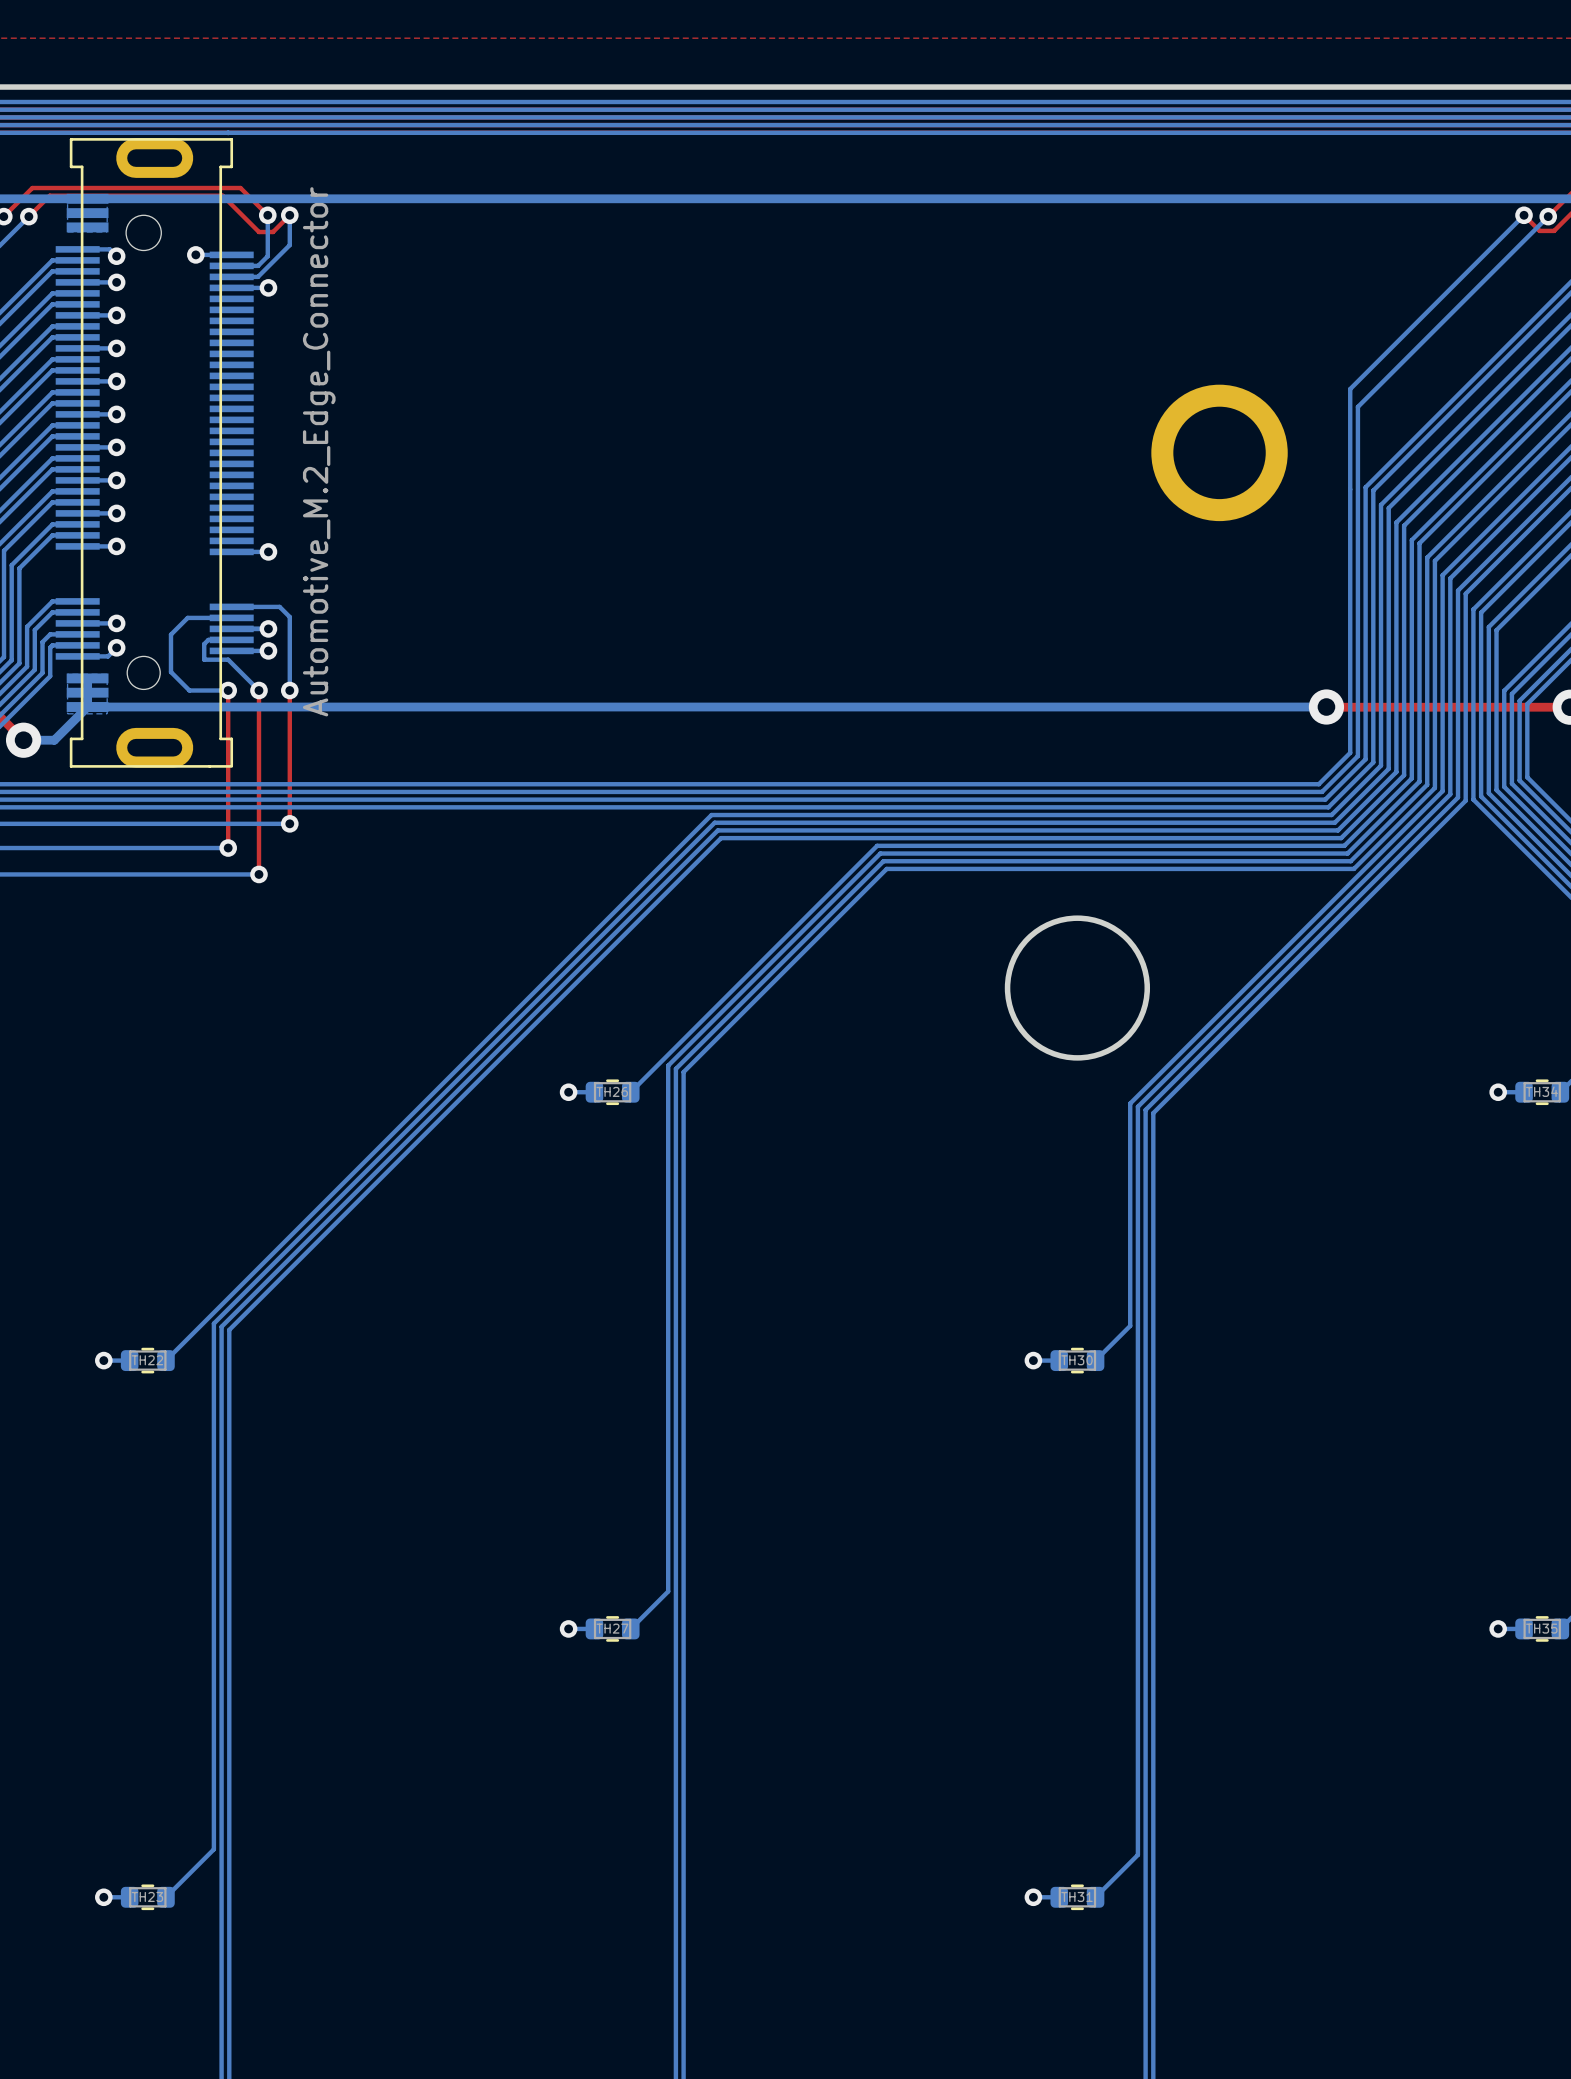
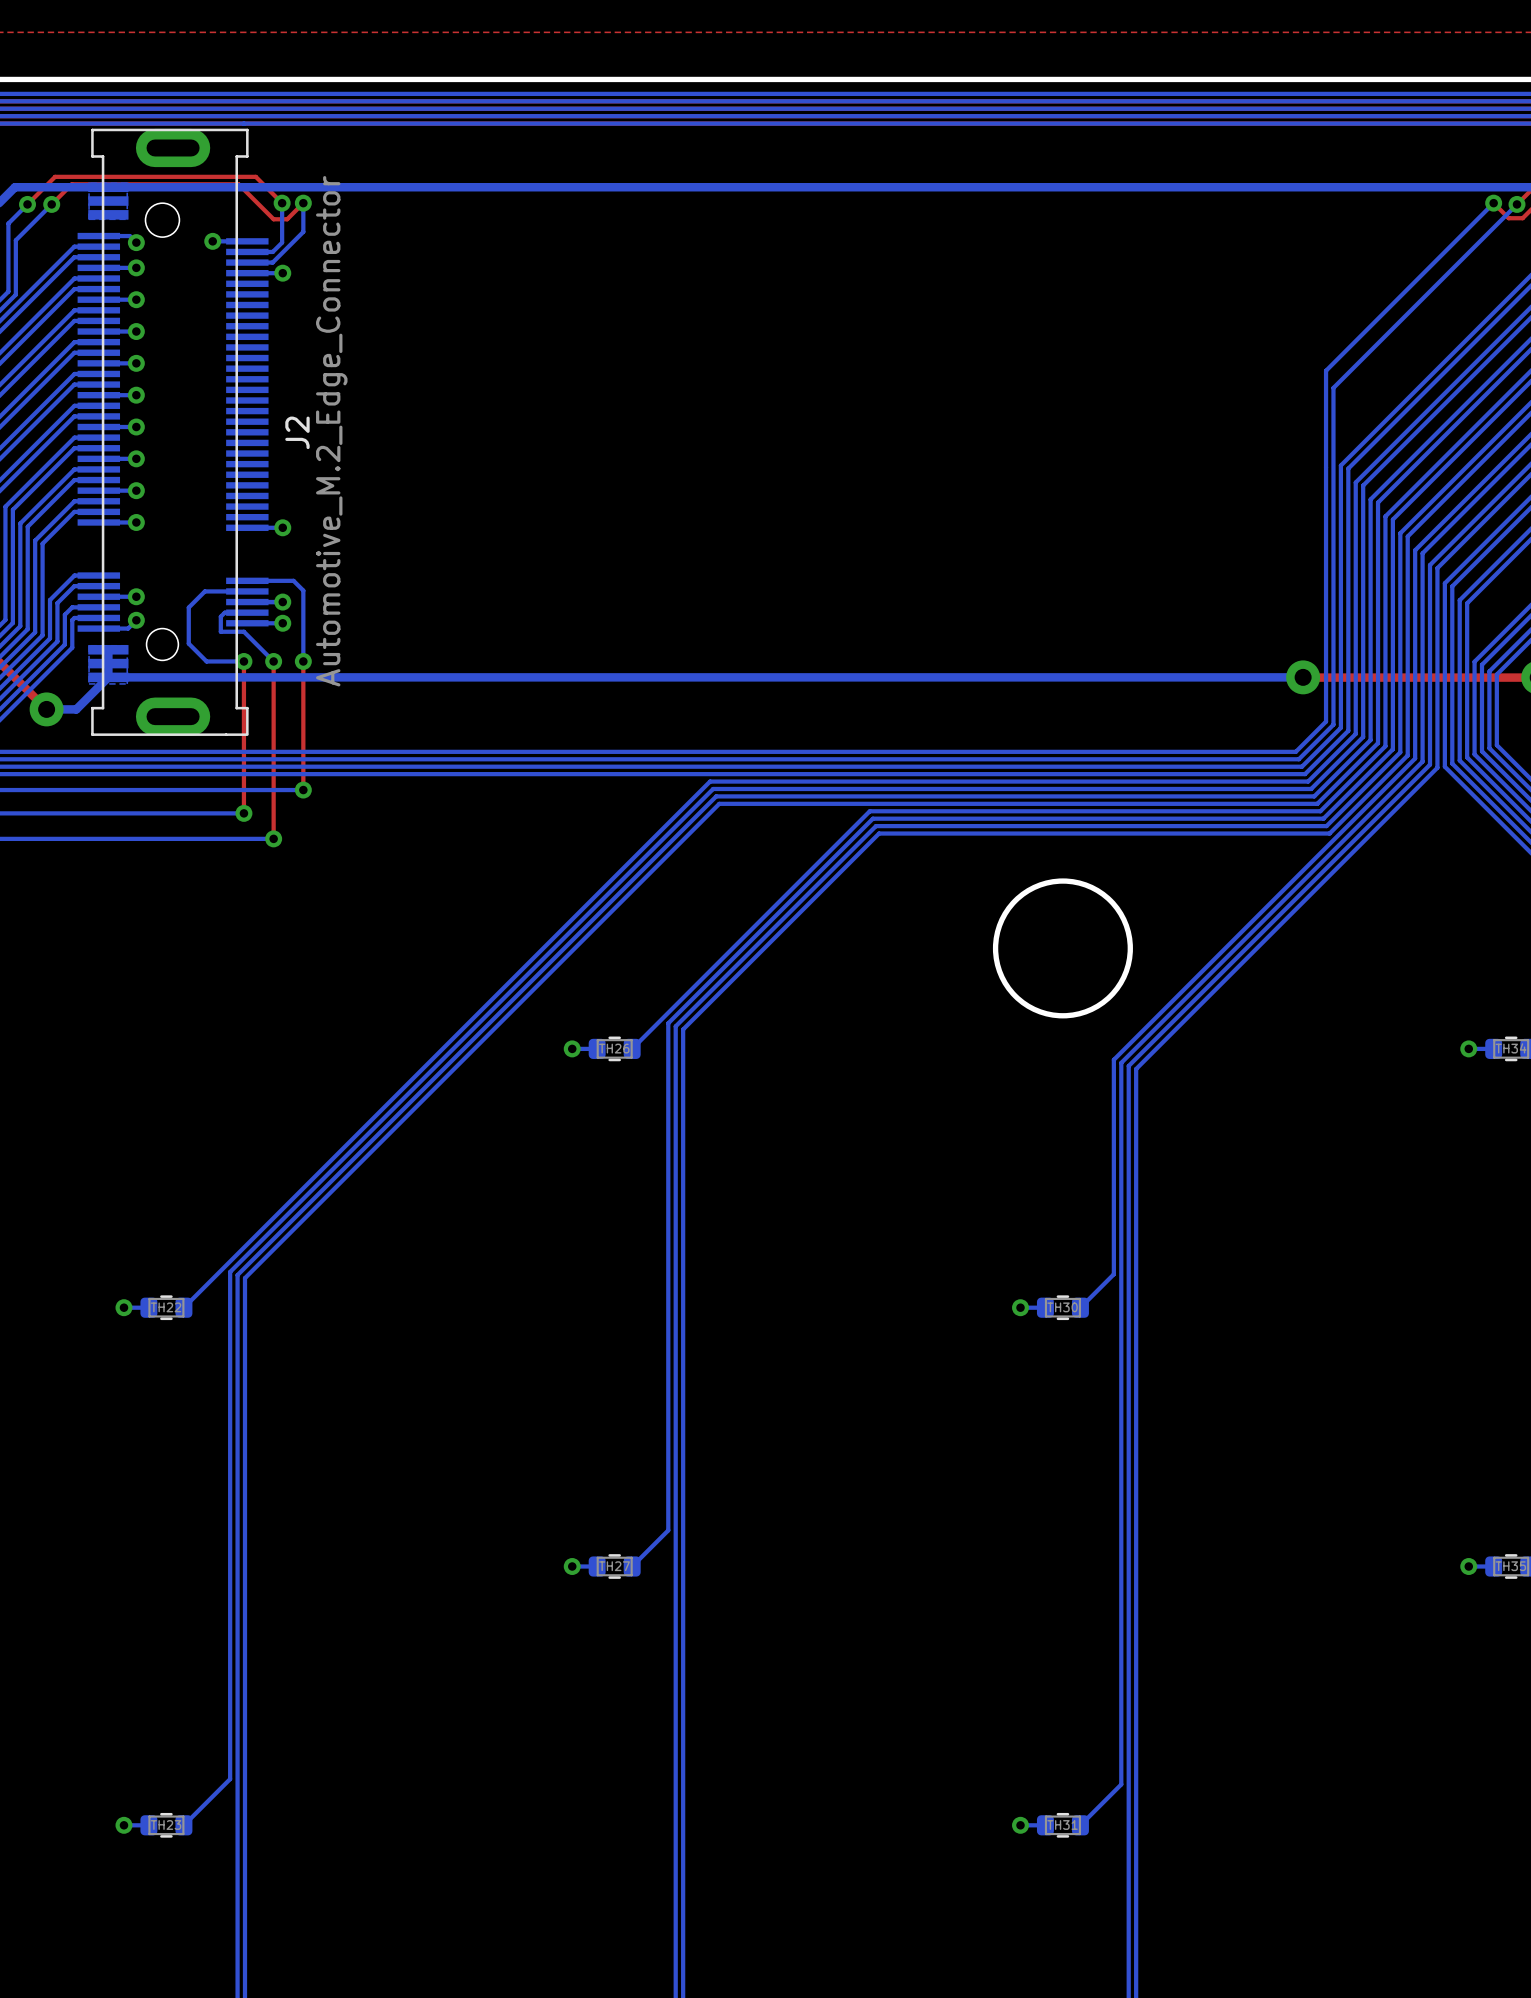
J2: none -> Automotive_M.2_Edge_Connector (173, 432)
part: Automotive_M.2_Edge_Connector (671, 452) -> none

